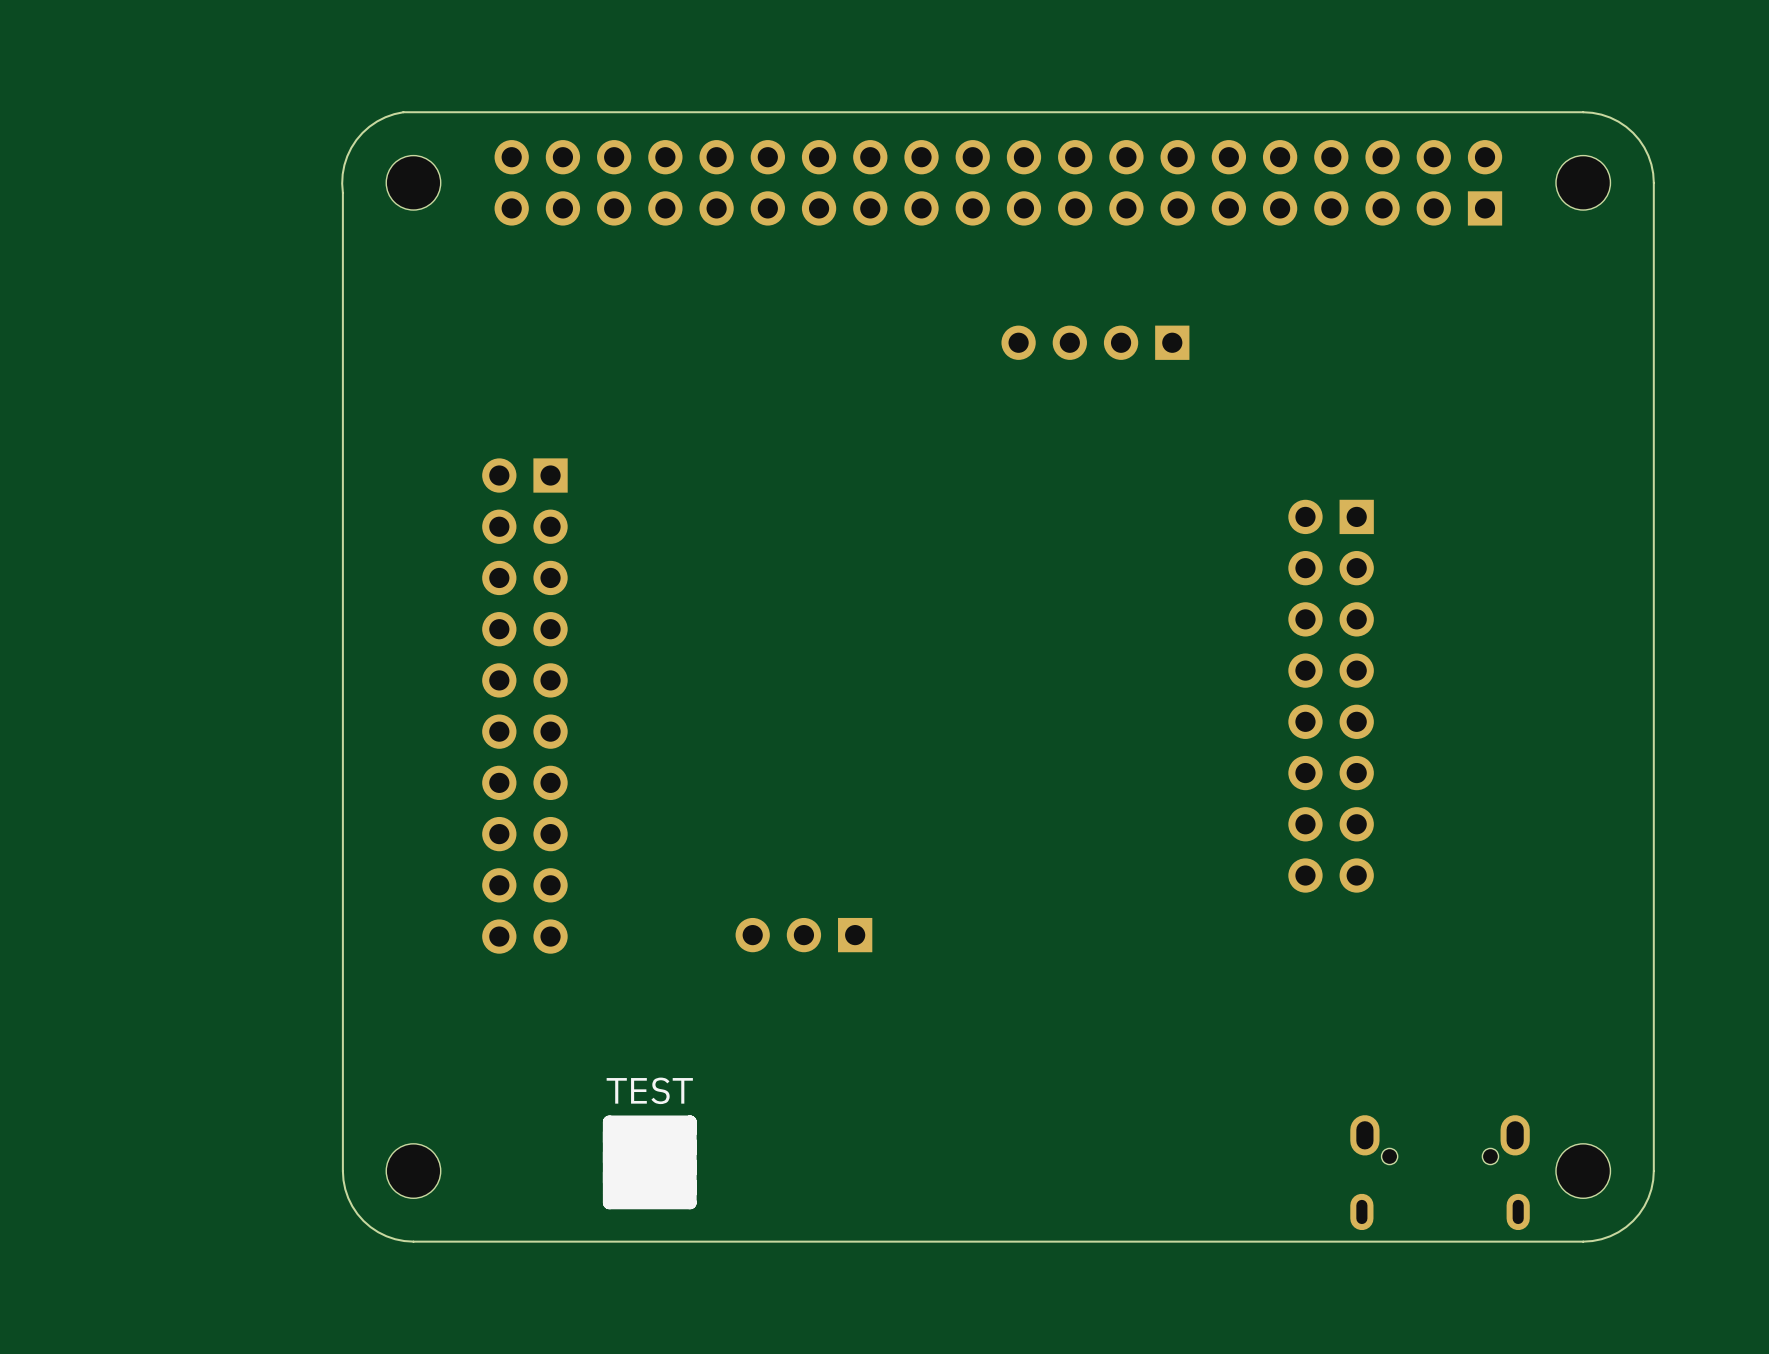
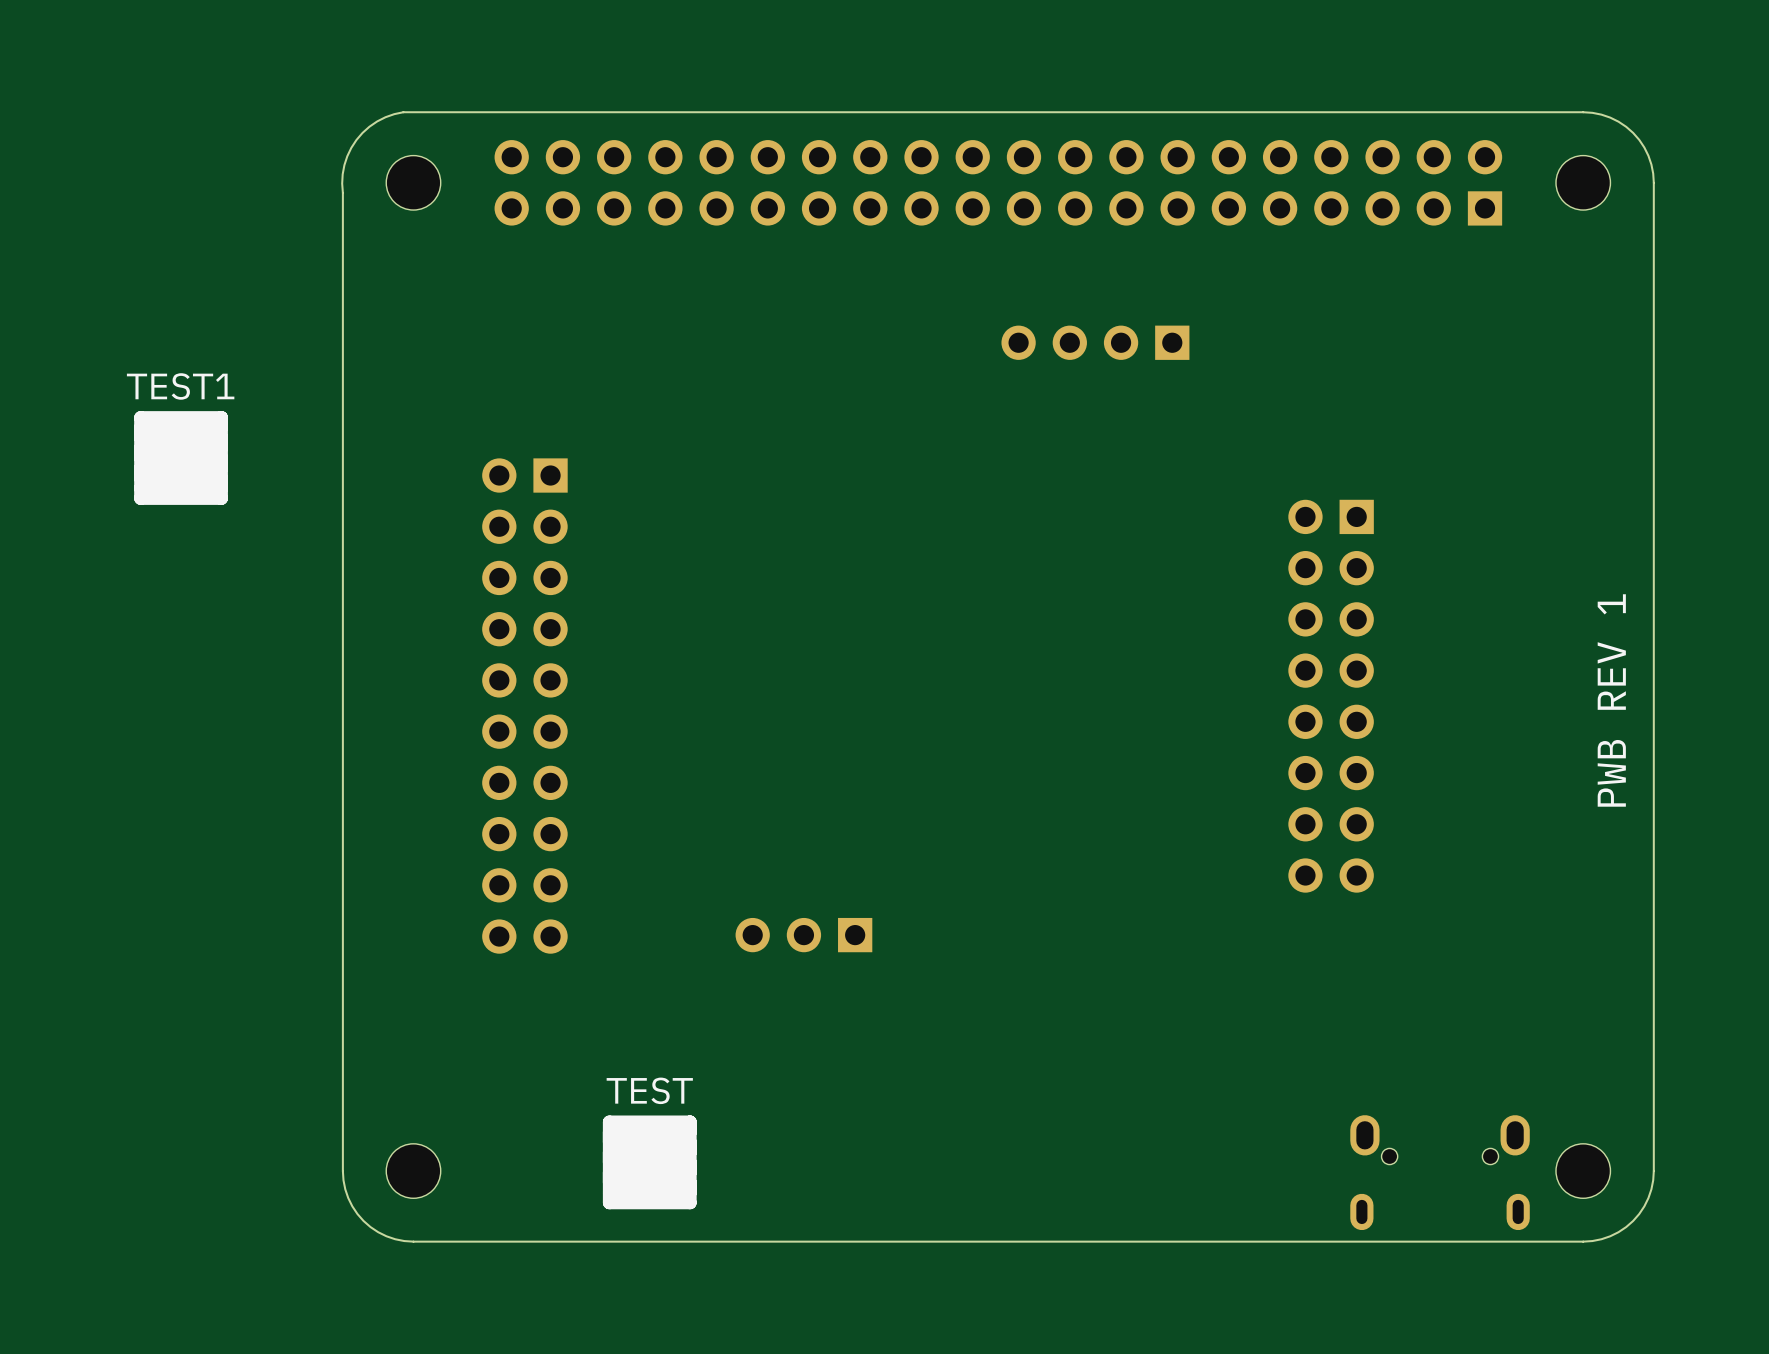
TEST1: none -> (181, 458)
text: none -> PWB REV 1 (1611, 700)

